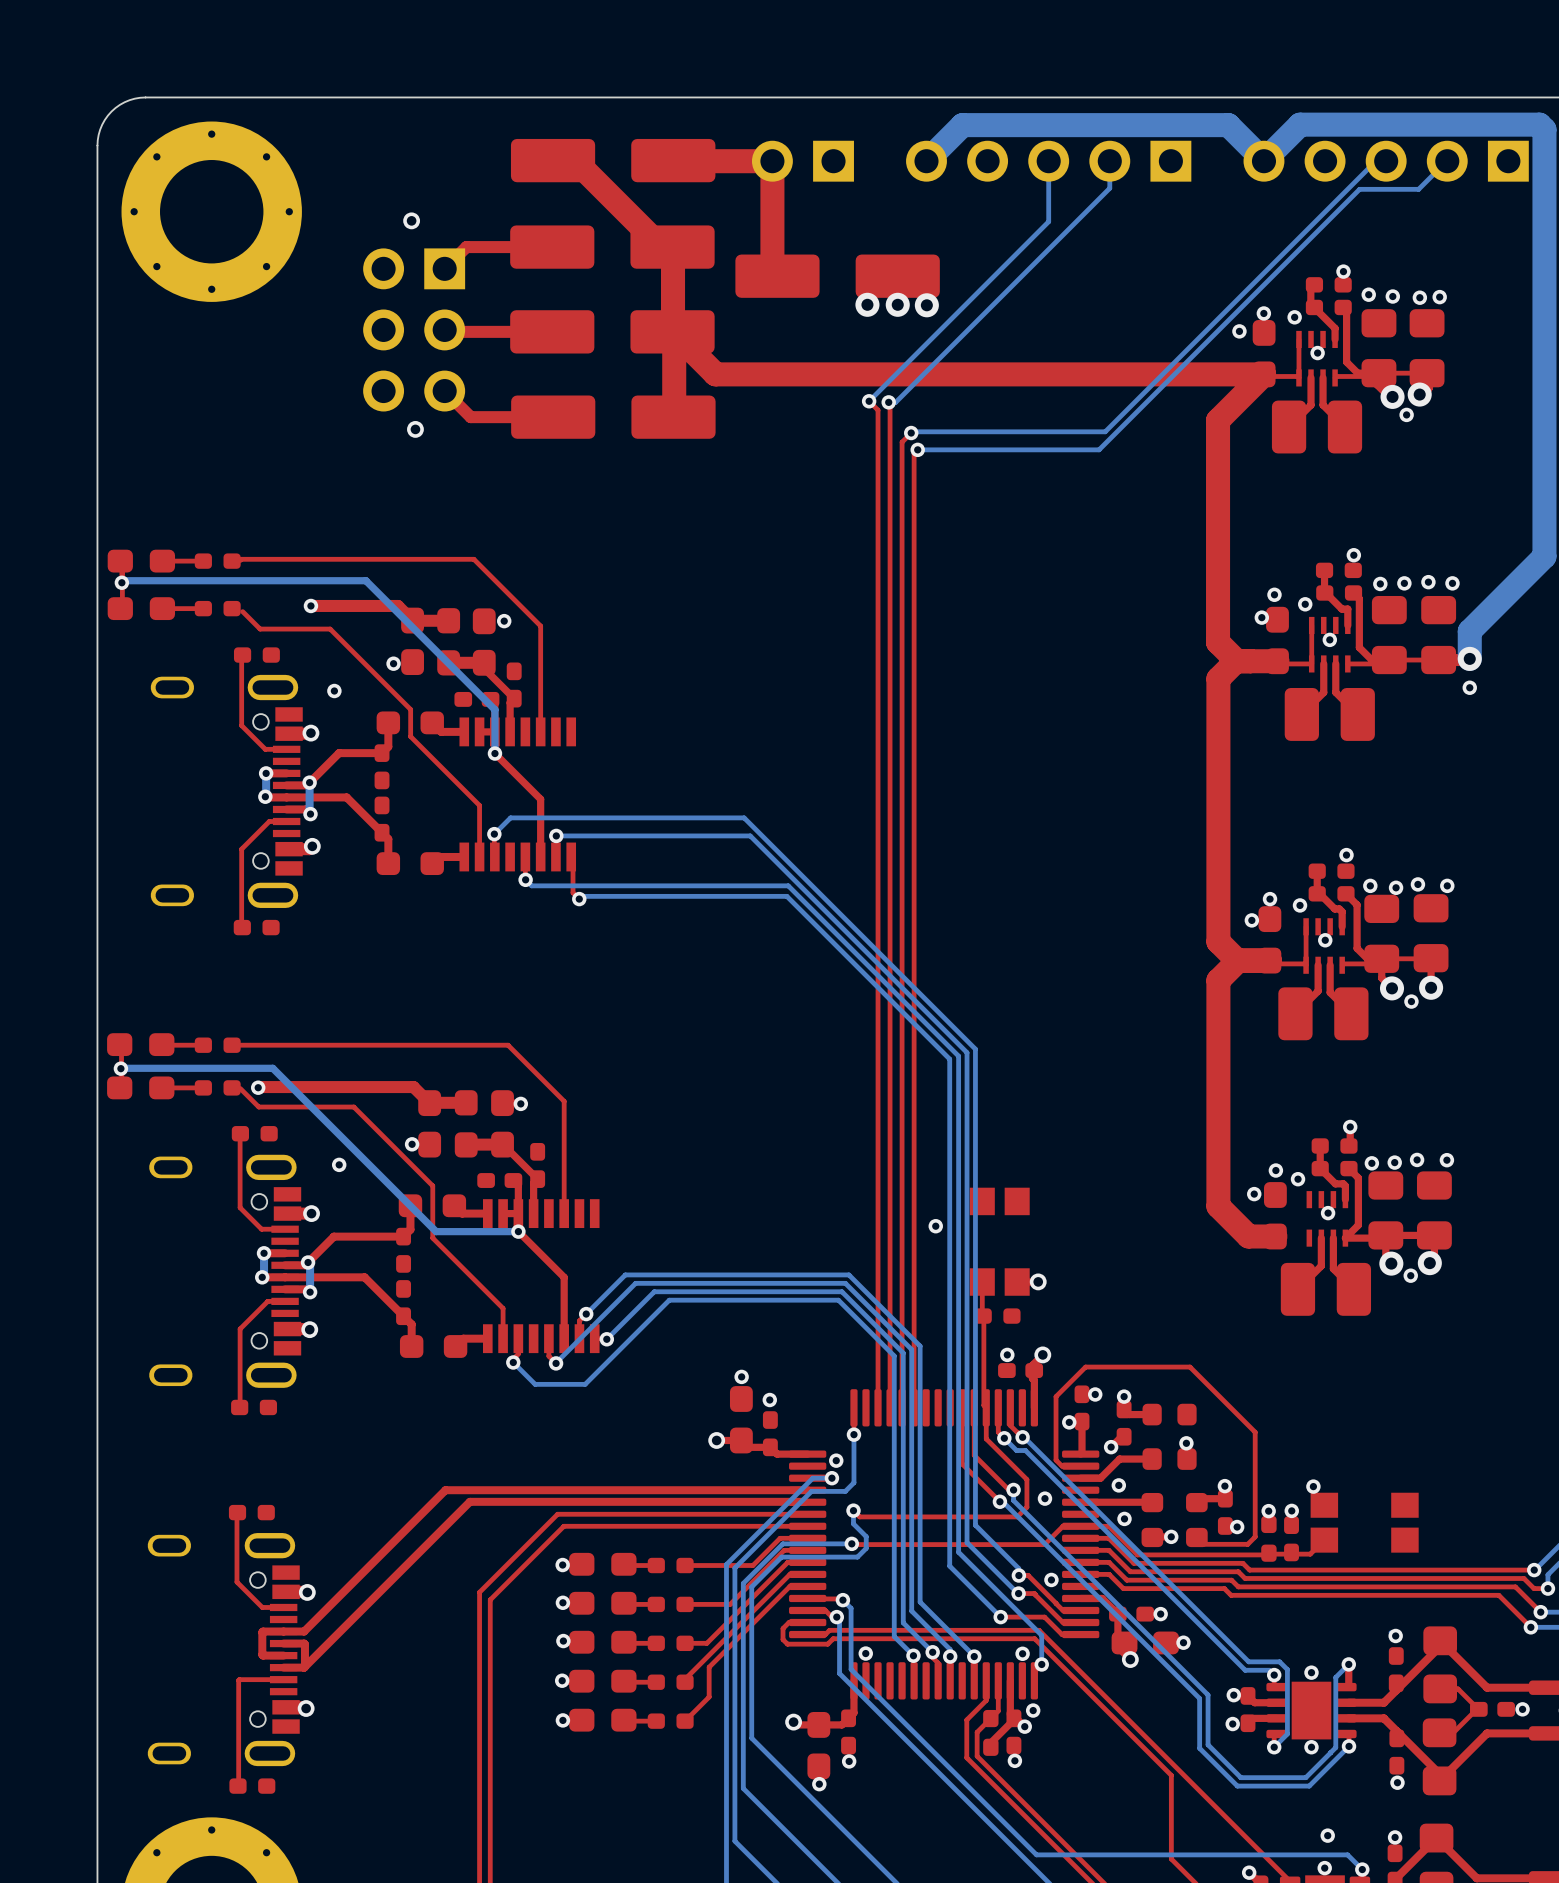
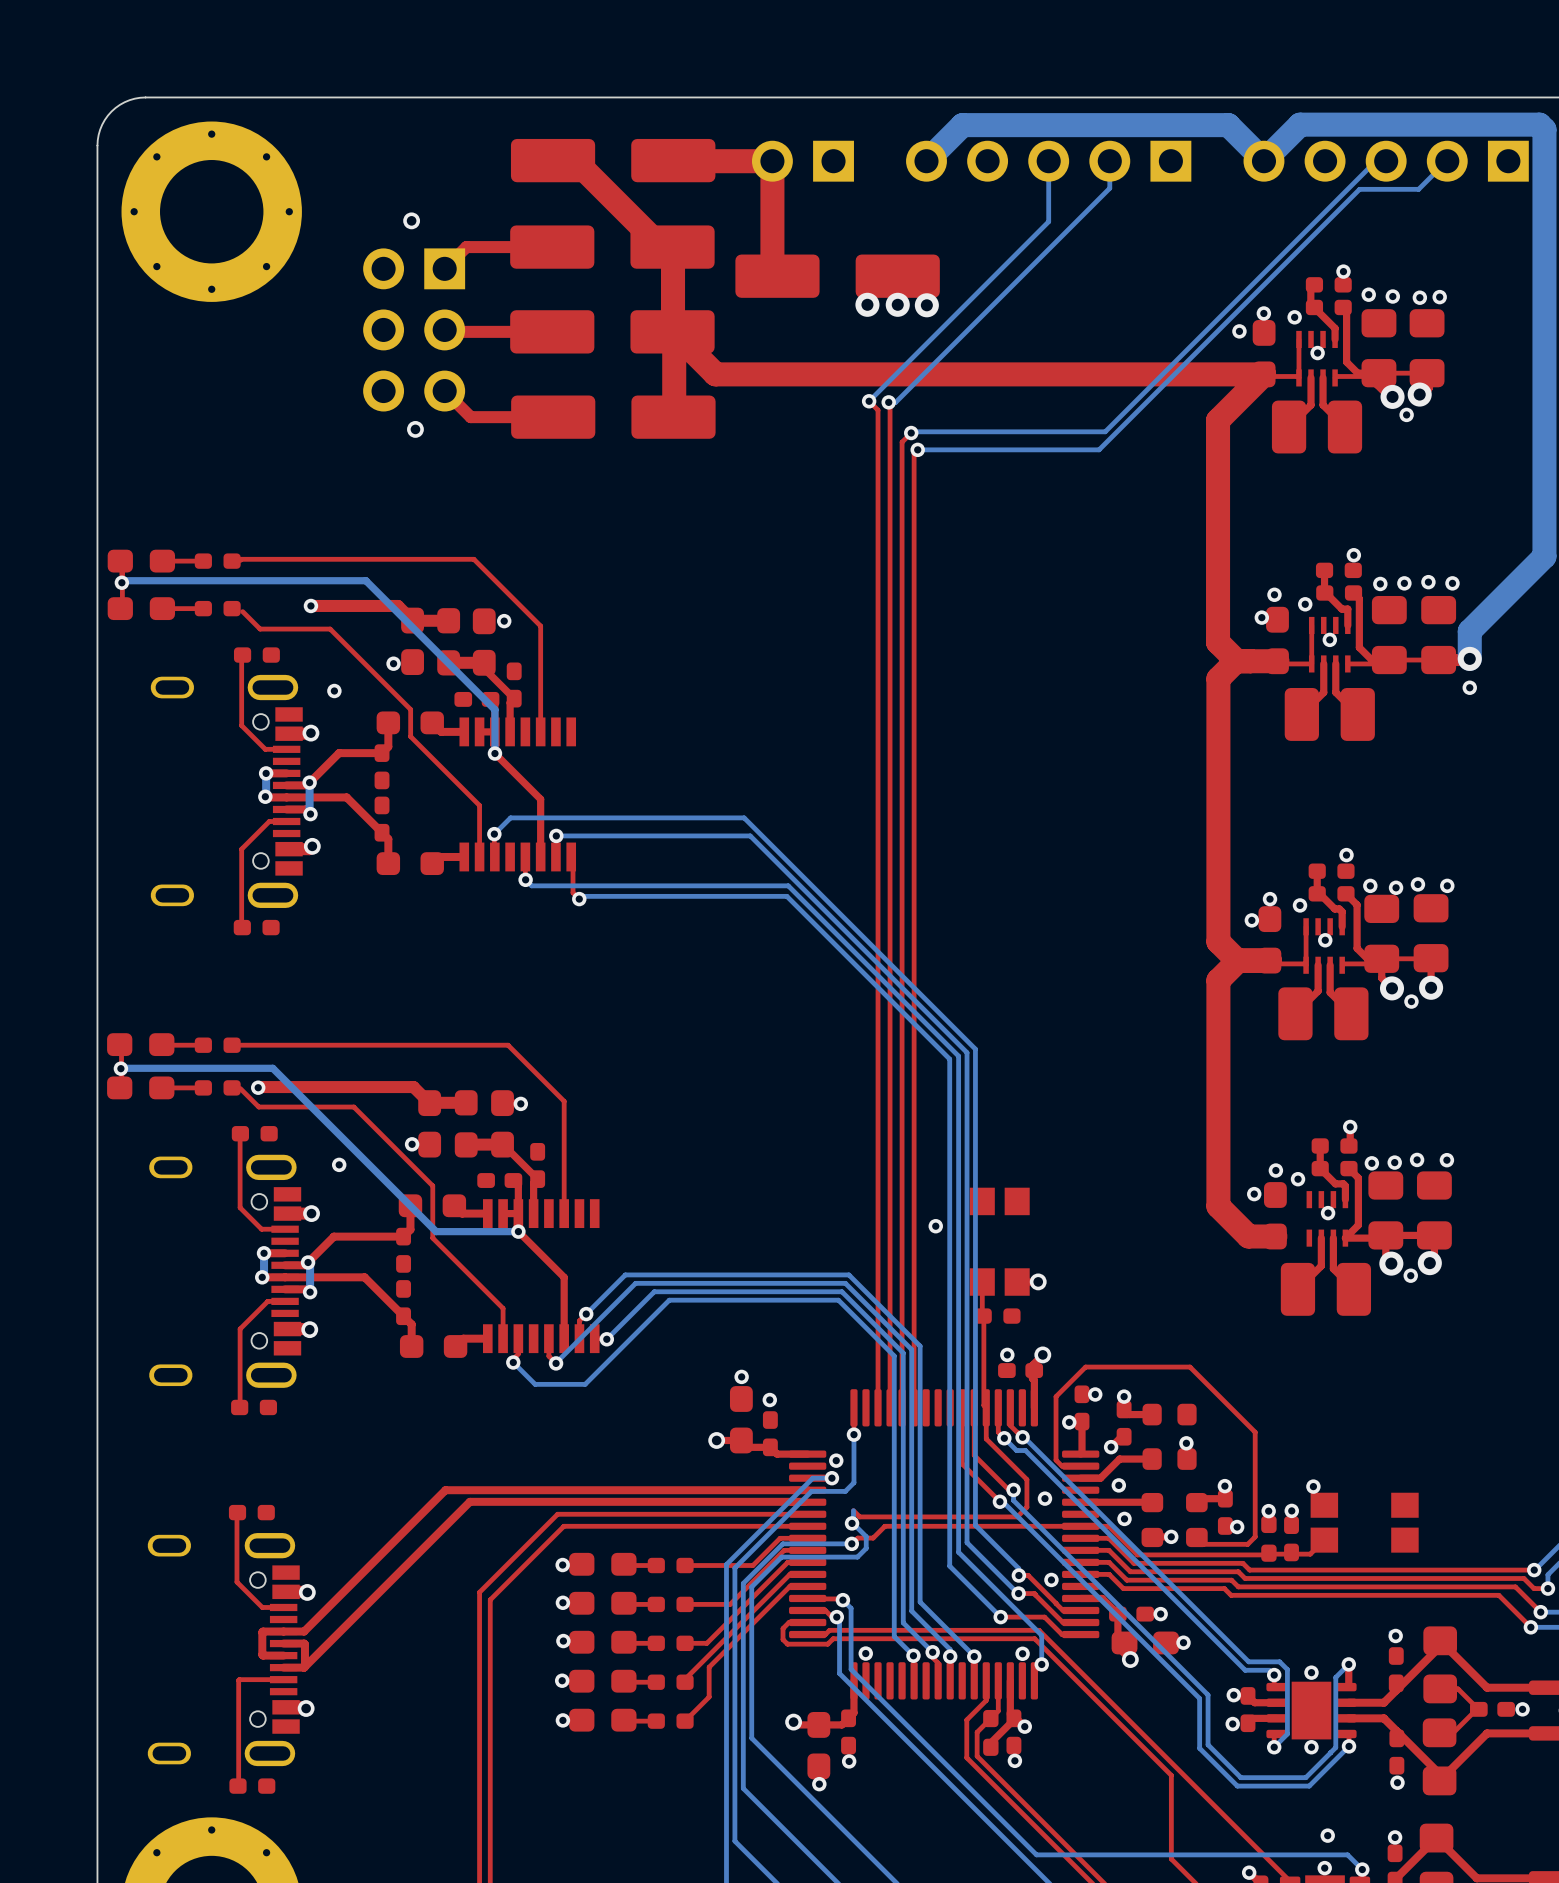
via position: (853, 1510) -> (852, 1523)
top track: (1062, 1526) (1044, 1544) (851, 1543) -> (1062, 1526) (884, 1526) (873, 1538) (857, 1538) (853, 1542)
via: (1033, 1710) -> none

